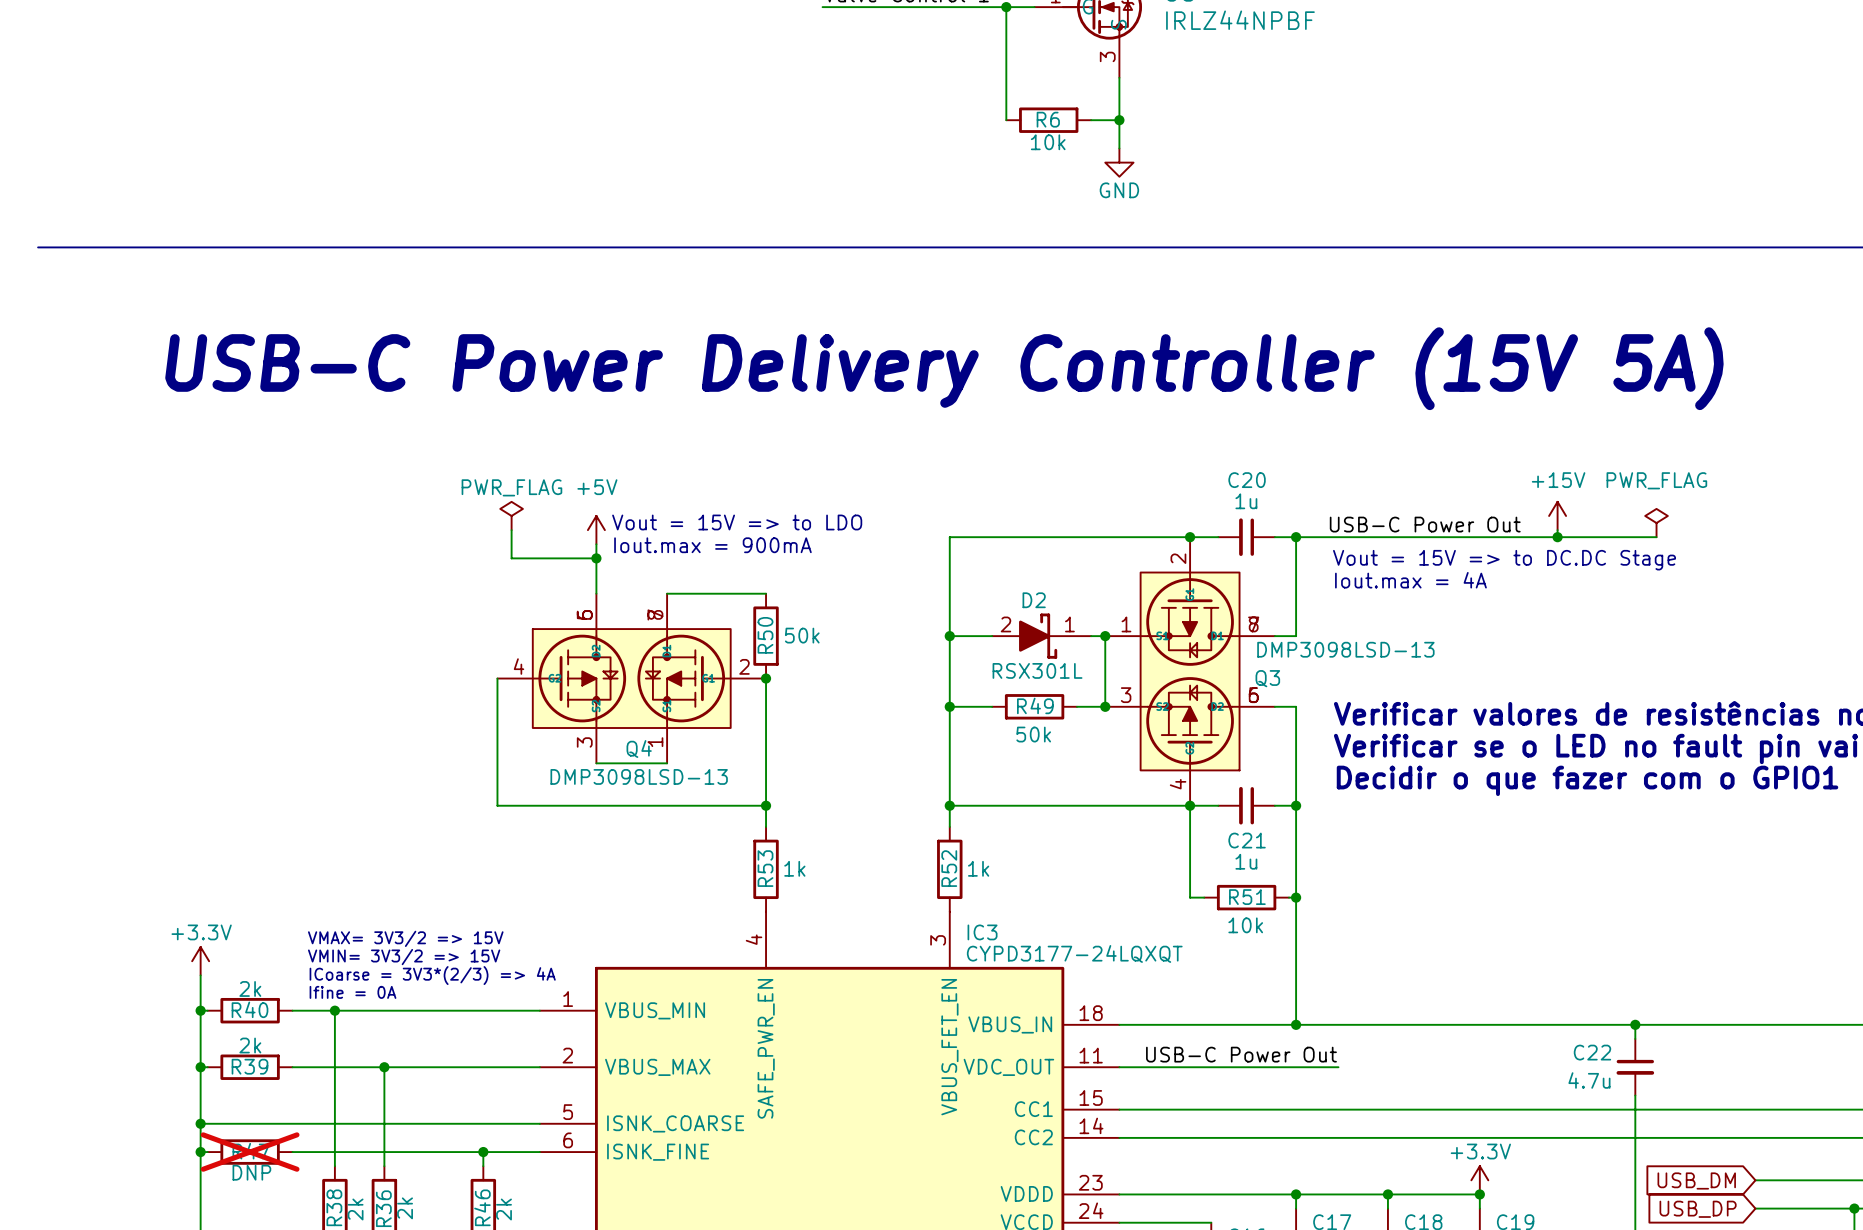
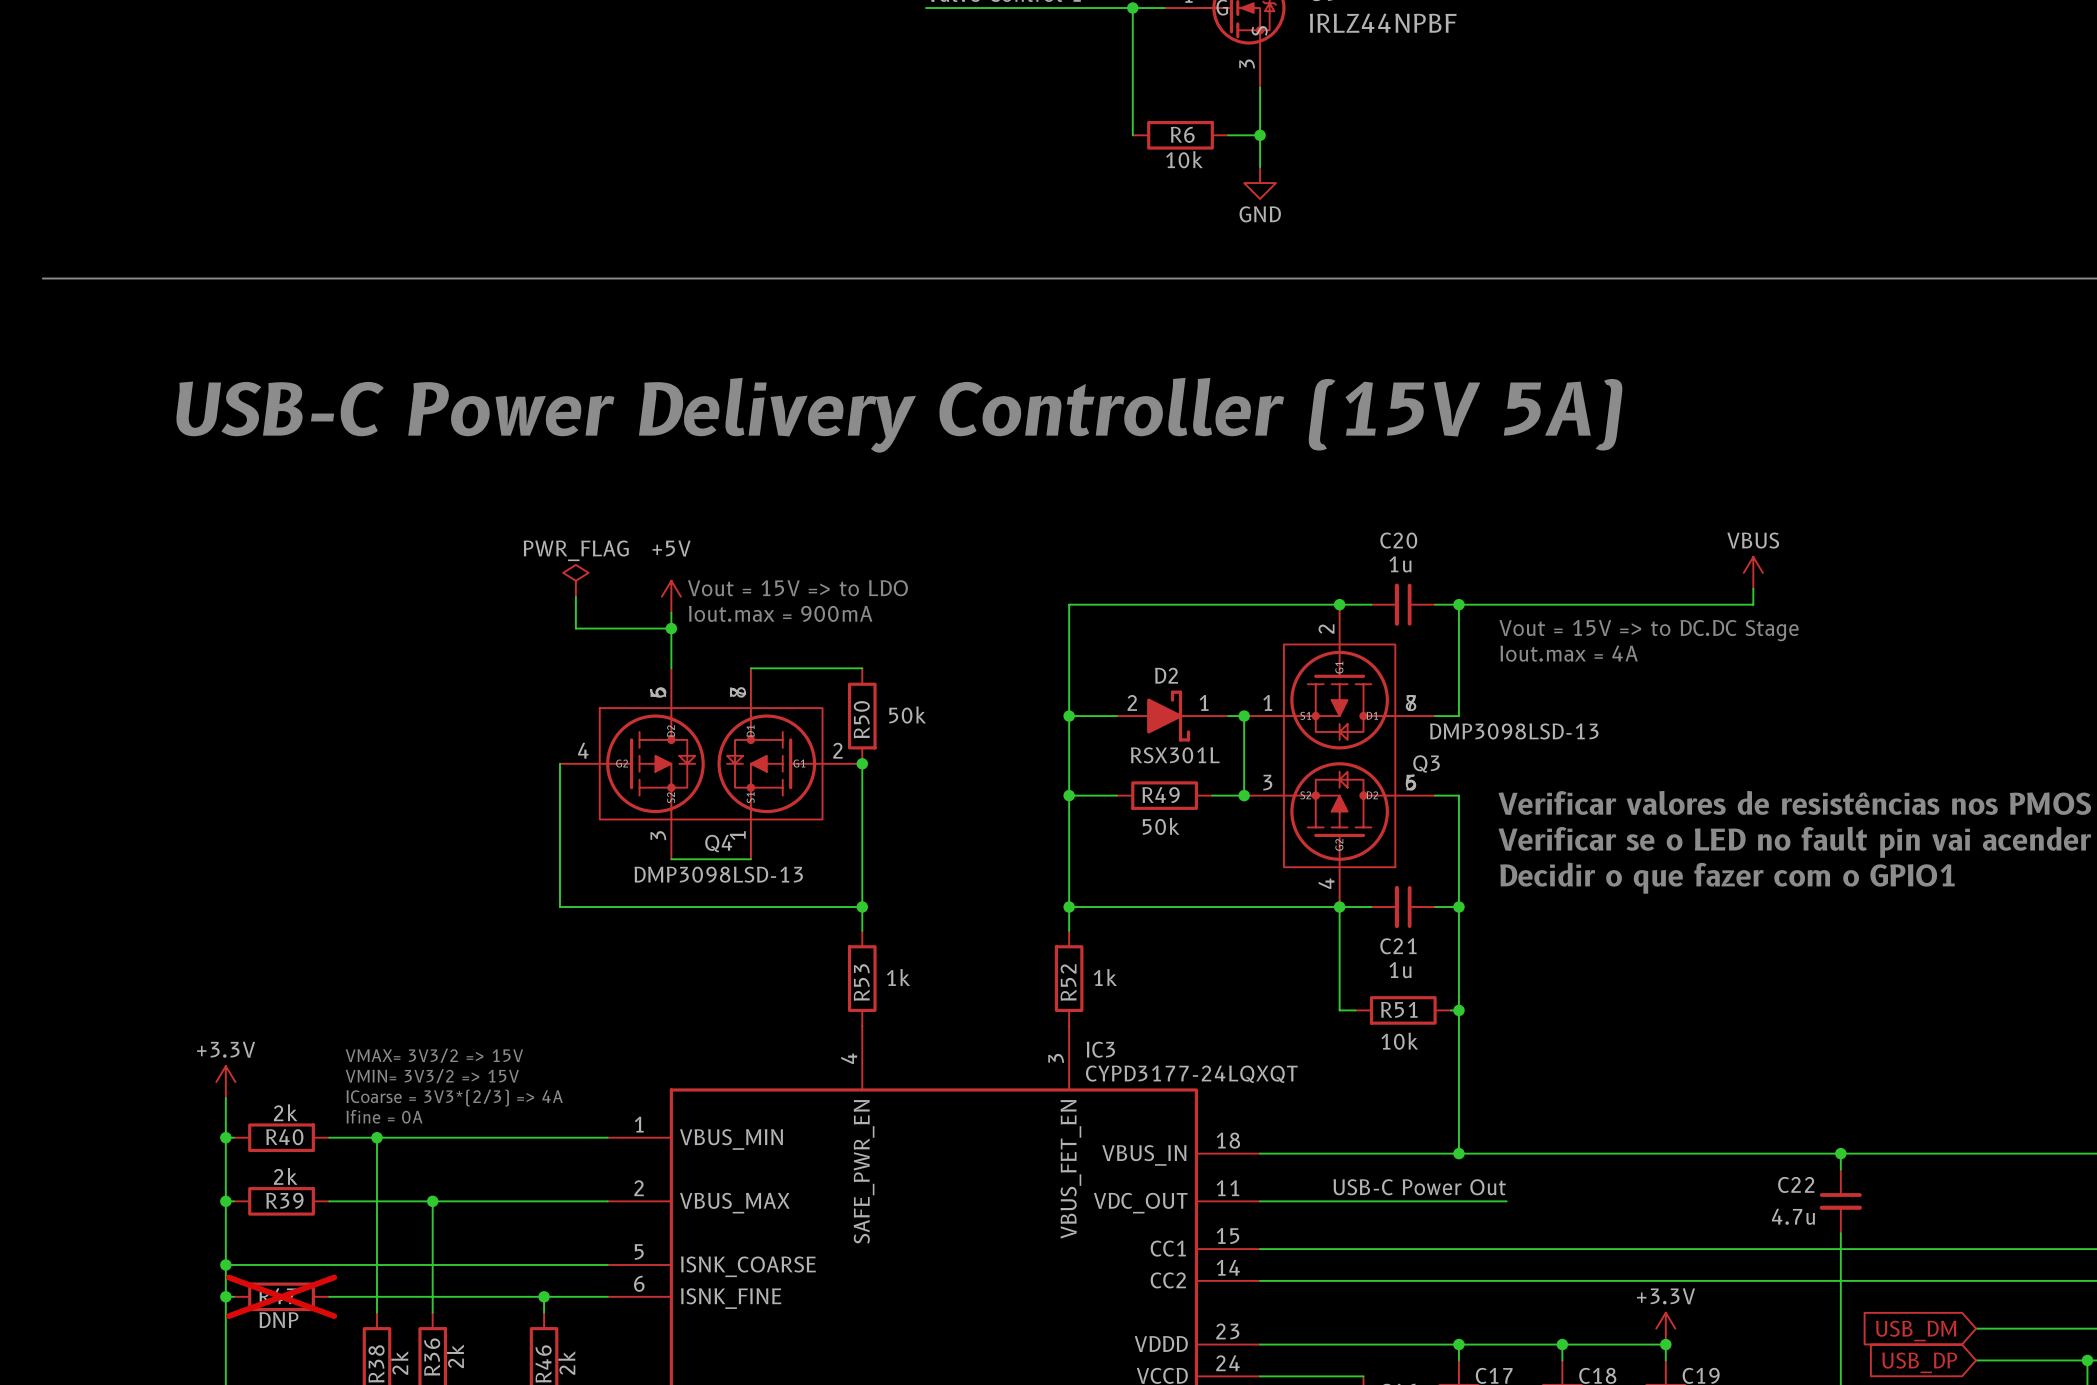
power symbol: +15V (1557, 515) -> VBUS (1753, 572)
power symbol: PWR_FLAG (1656, 523) -> none
label: USB-C Power Out (1425, 524) -> none
wire: (1557, 537) (1656, 537) -> none
junction: (1557, 537) -> none

